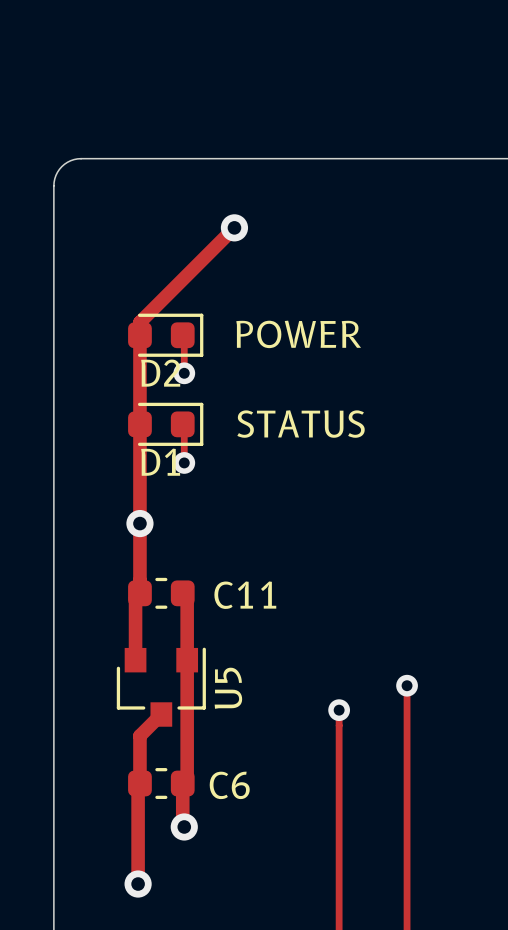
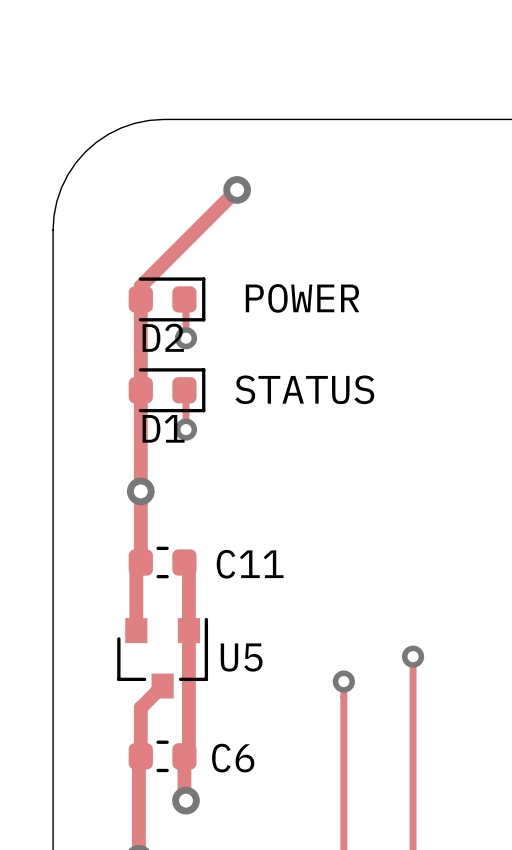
board edge: (162, 158) (77, 158) (61, 166) (54, 182) (53, 267) -> (163, 119) (135, 123) (121, 127) (96, 142) (85, 151) (75, 162) (61, 187) (56, 201) (53, 230)
U5 name rotation: 0° (228, 688) -> 90° clockwise (241, 657)

